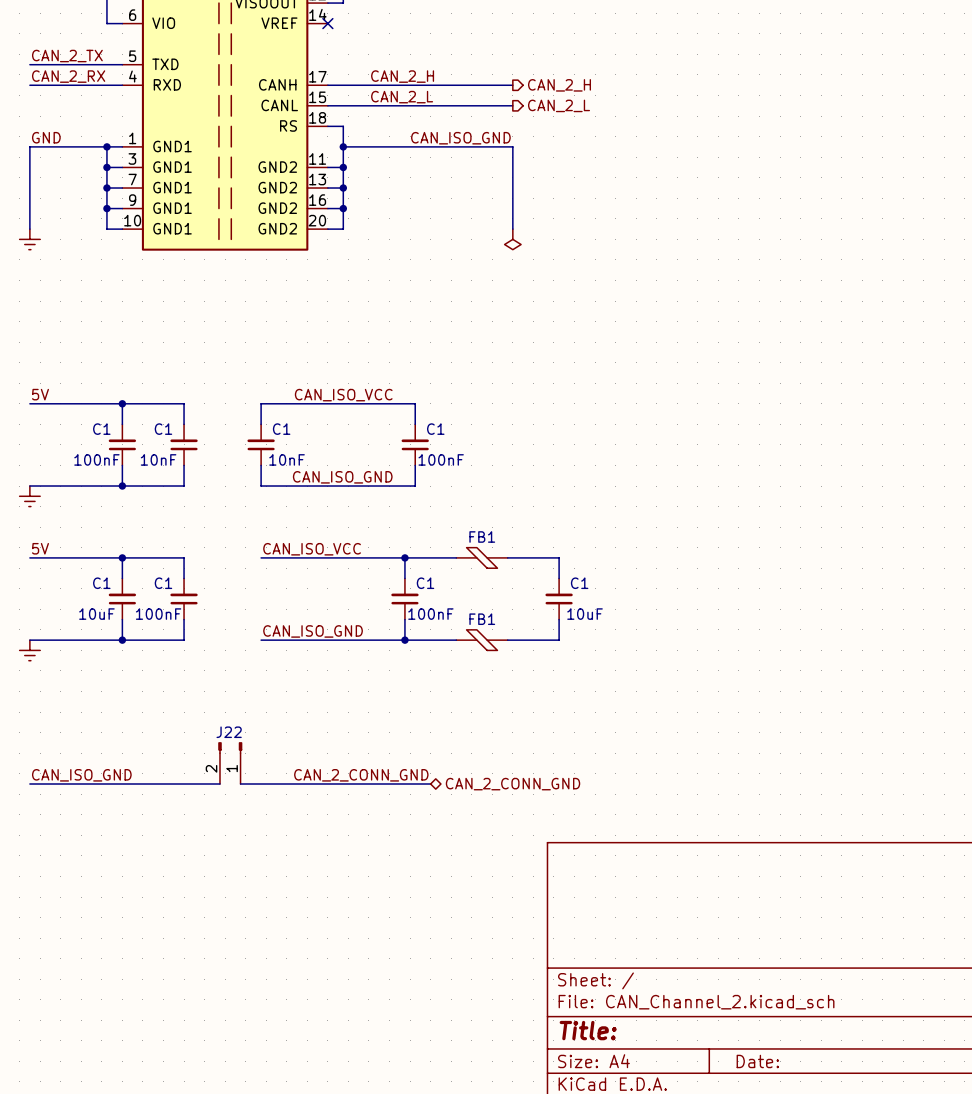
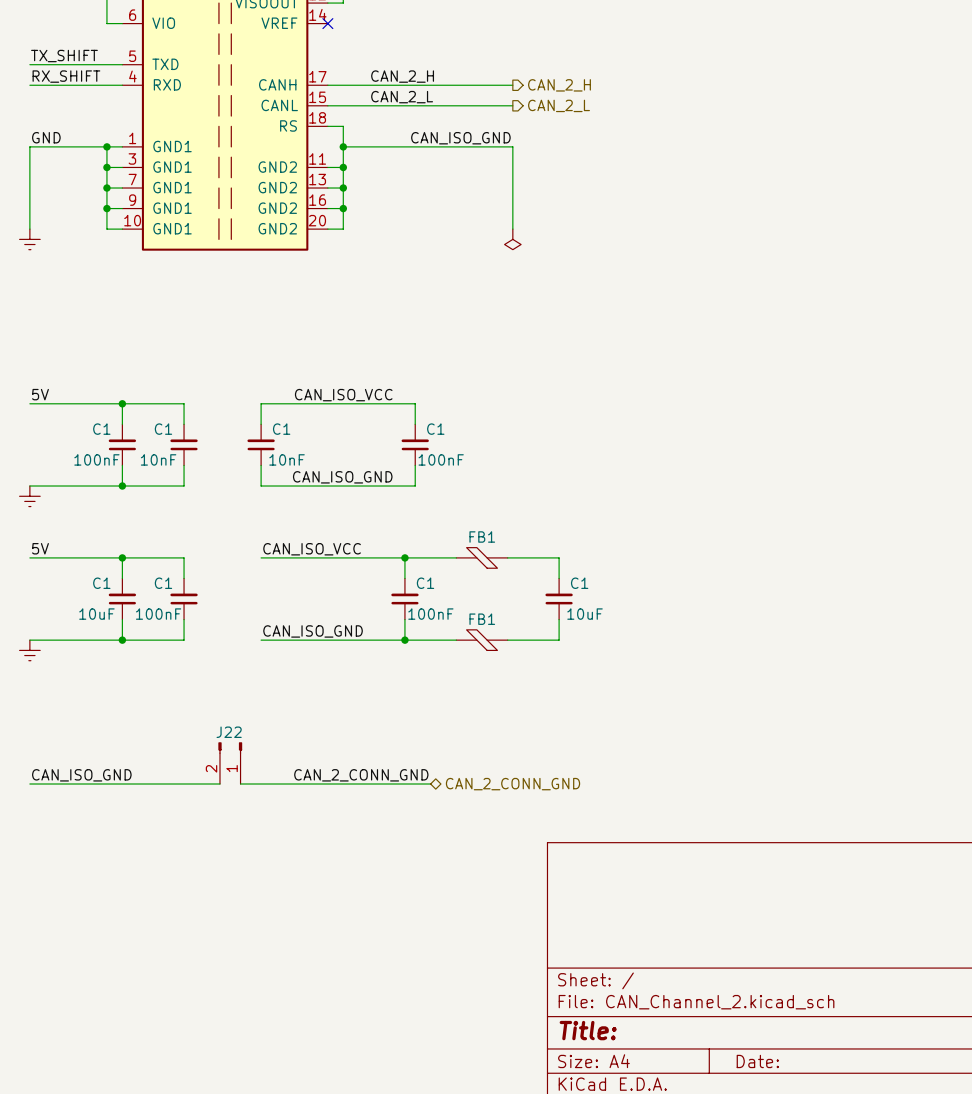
label: CAN_2_TX (67, 56) -> TX_SHIFT (64, 56)
label: CAN_2_RX (68, 76) -> RX_SHIFT (66, 76)

